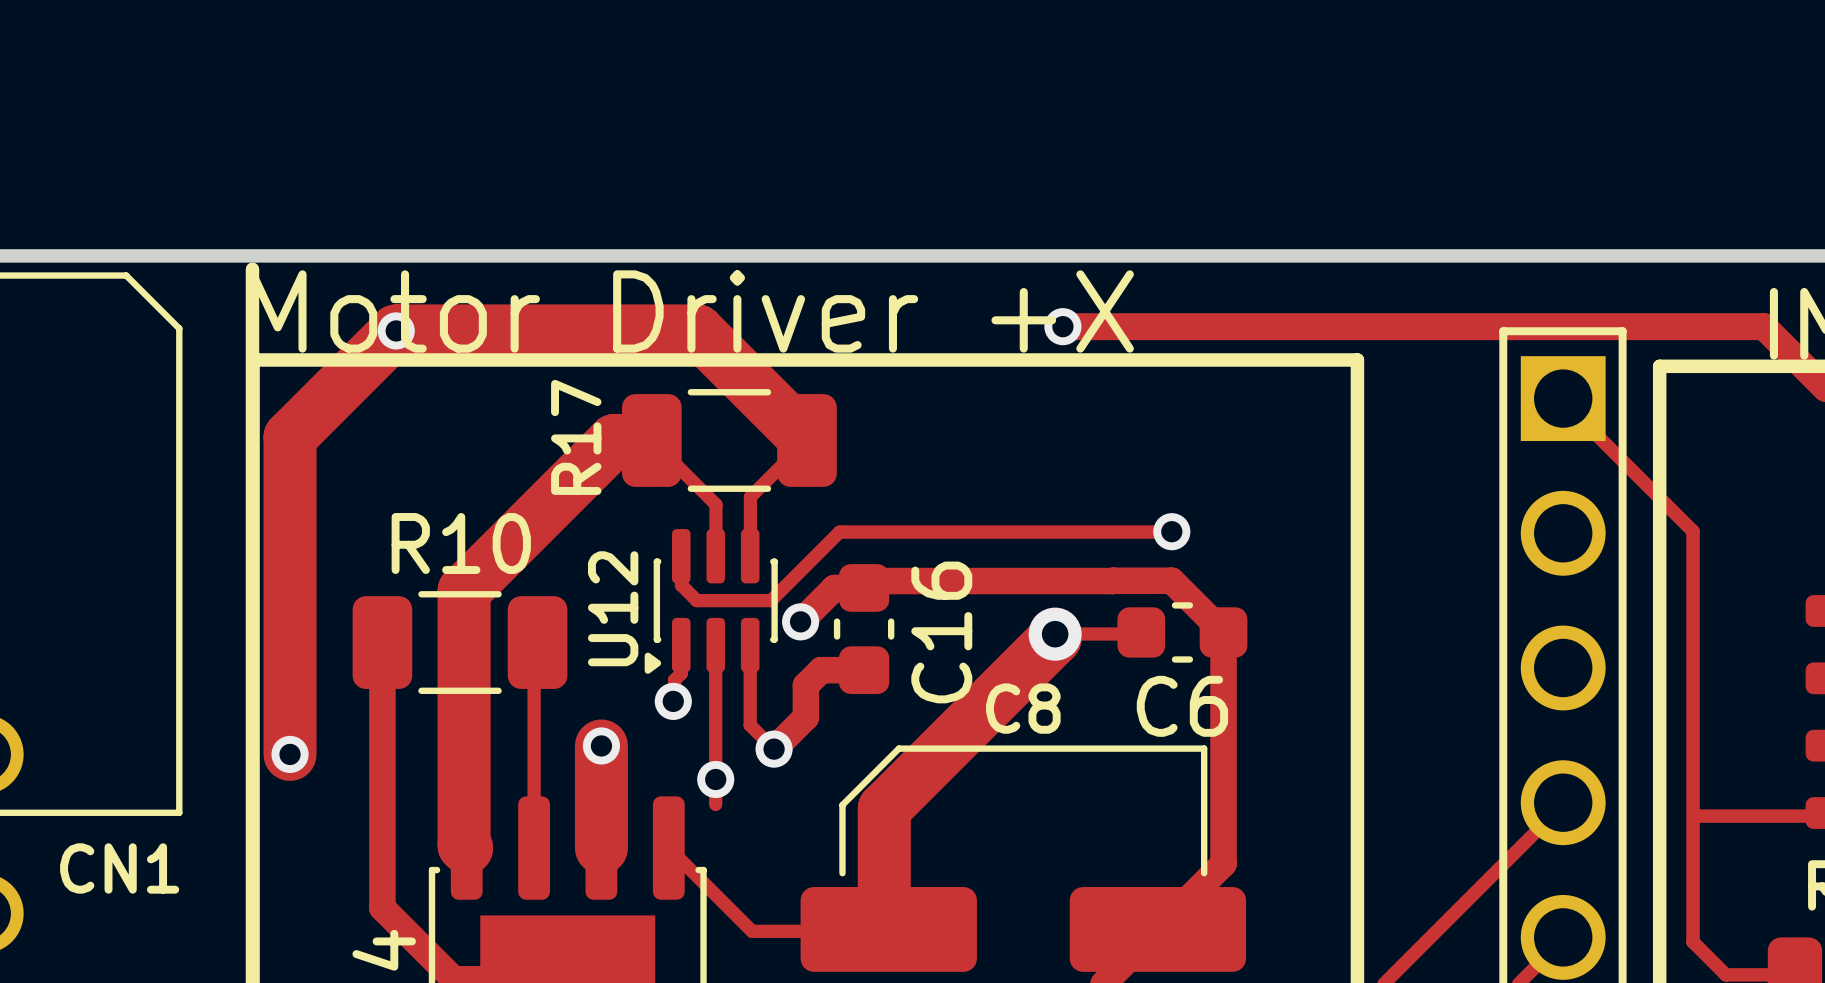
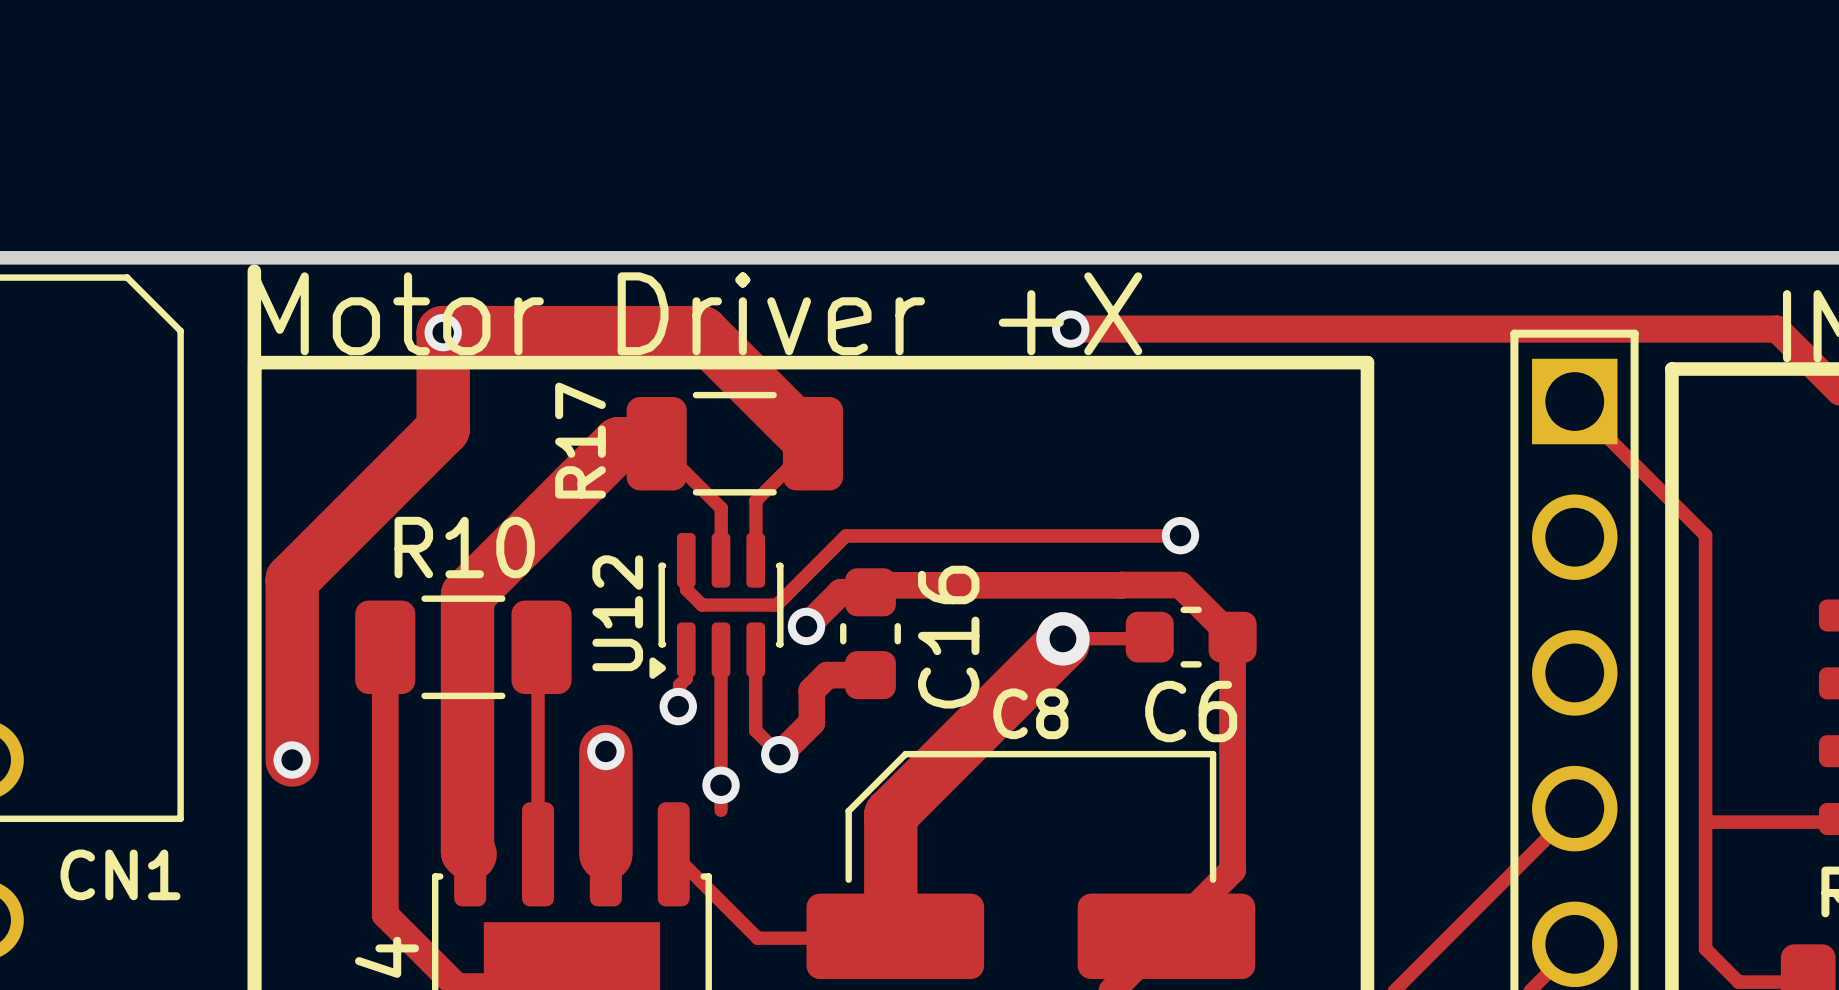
via position: (396, 330) -> (443, 332)
track: (697, 330) (396, 330) (290, 437) (290, 575) -> (702, 333) (443, 332) (443, 428) (292, 579)

